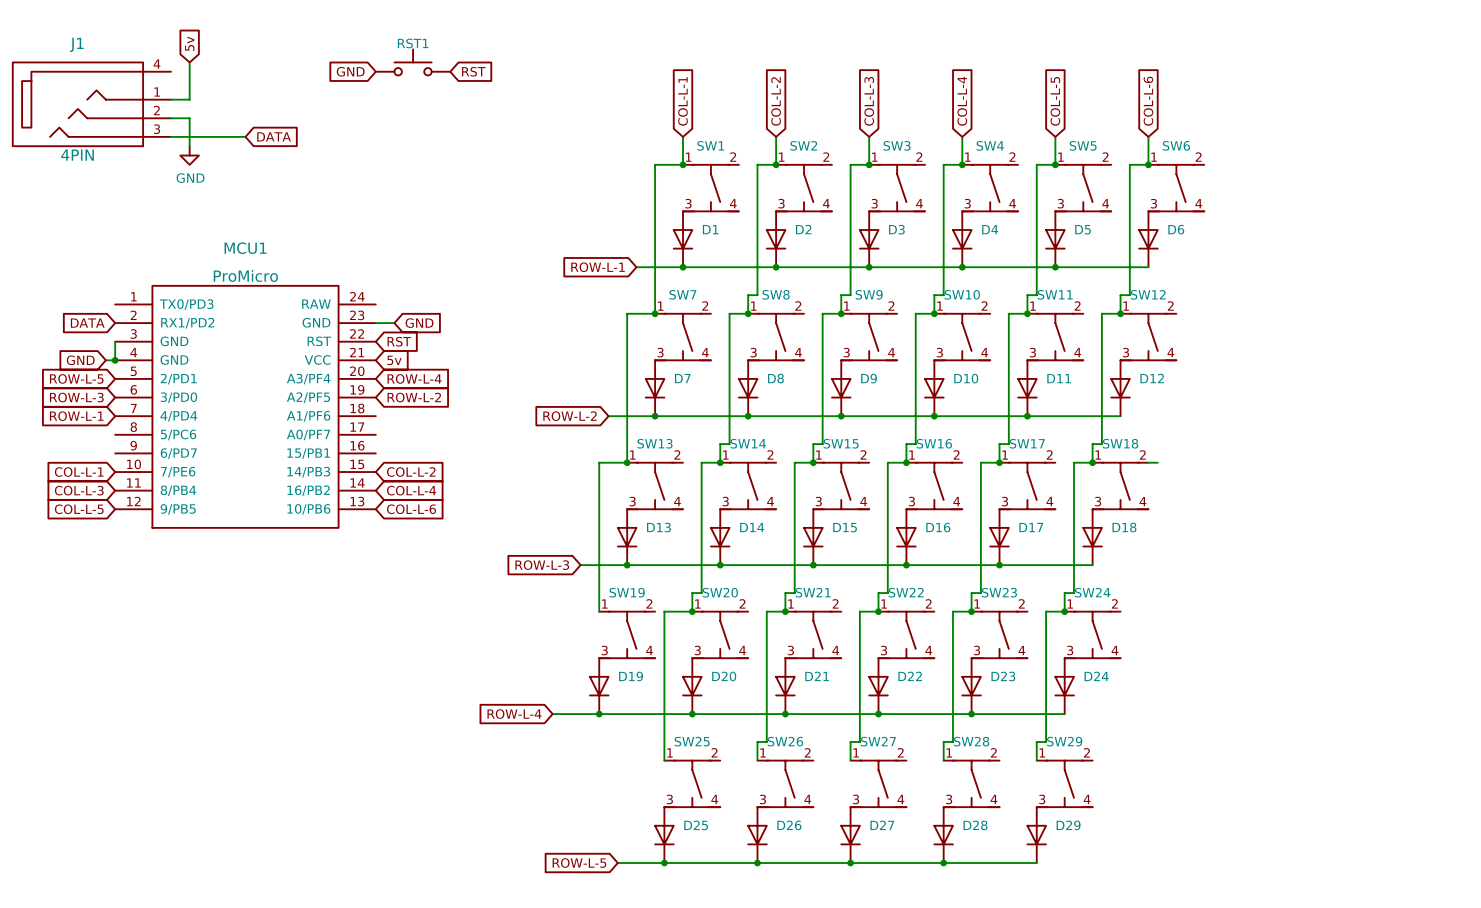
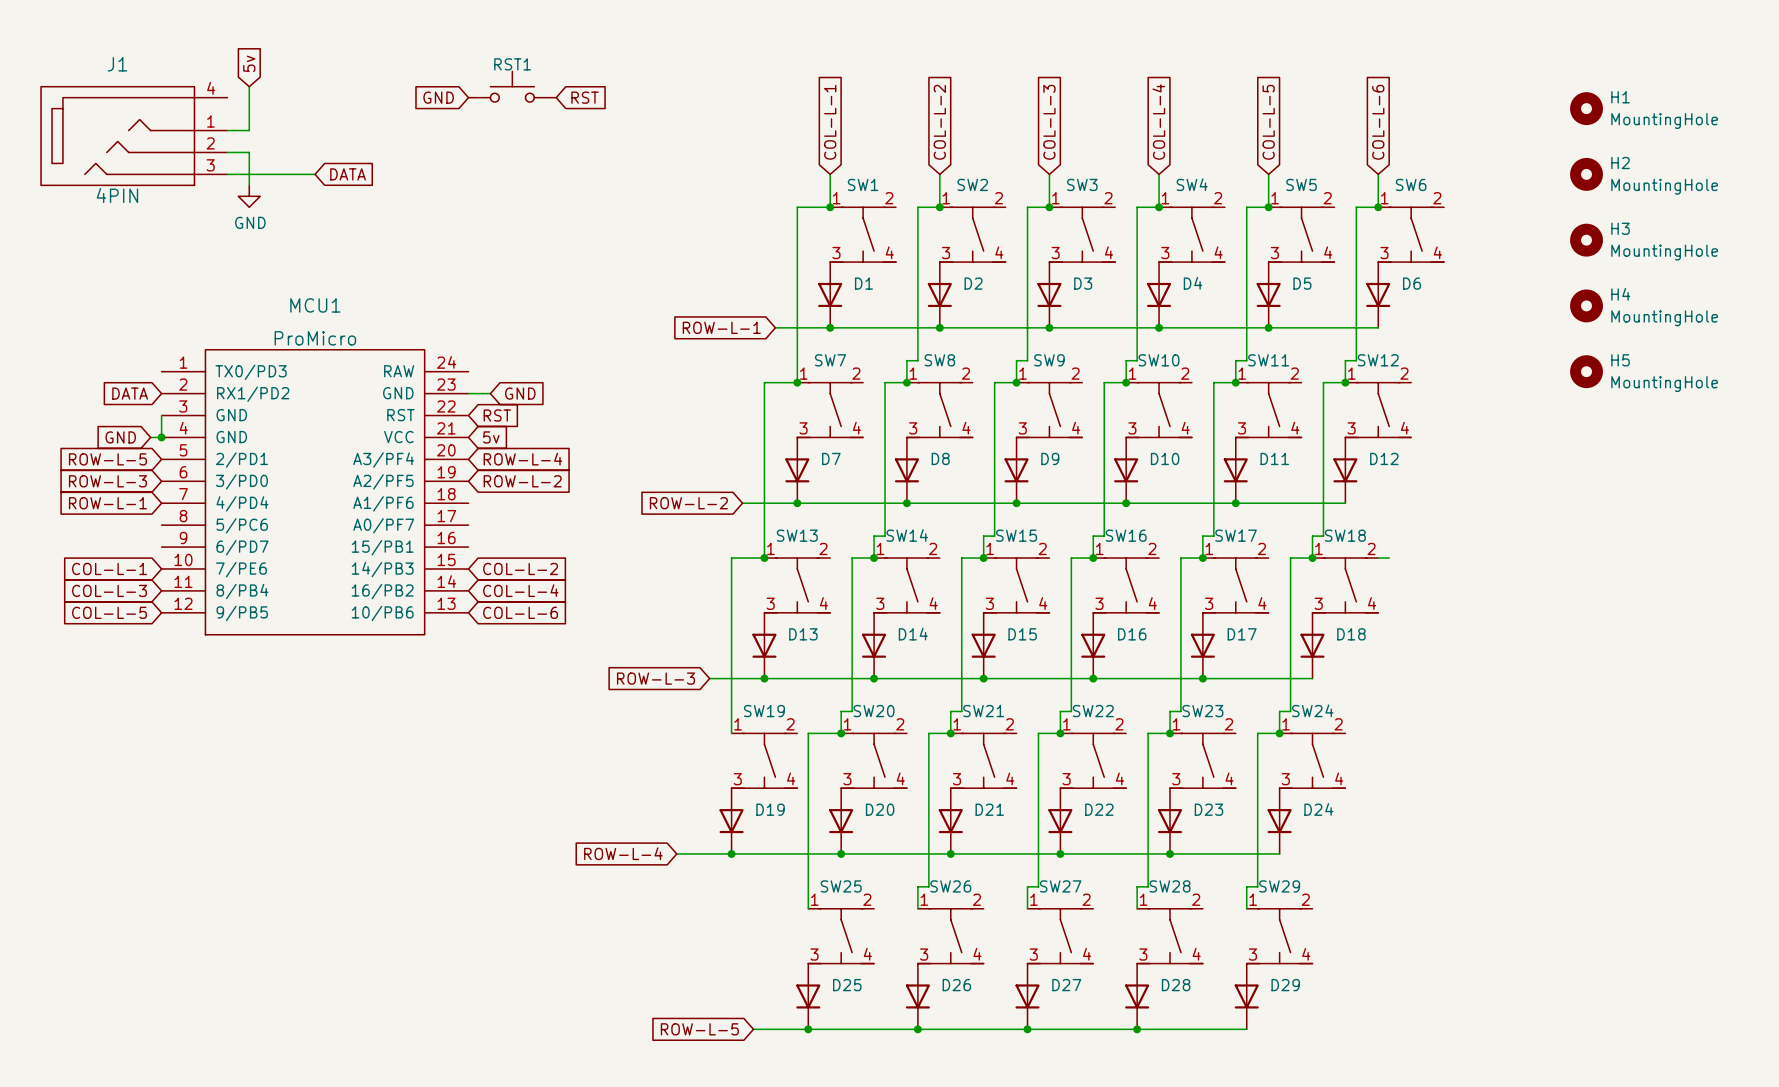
H1: none -> MountingHole (1586, 108)
H2: none -> MountingHole (1586, 174)
H3: none -> MountingHole (1586, 240)
H4: none -> MountingHole (1586, 305)
H5: none -> MountingHole (1586, 371)

